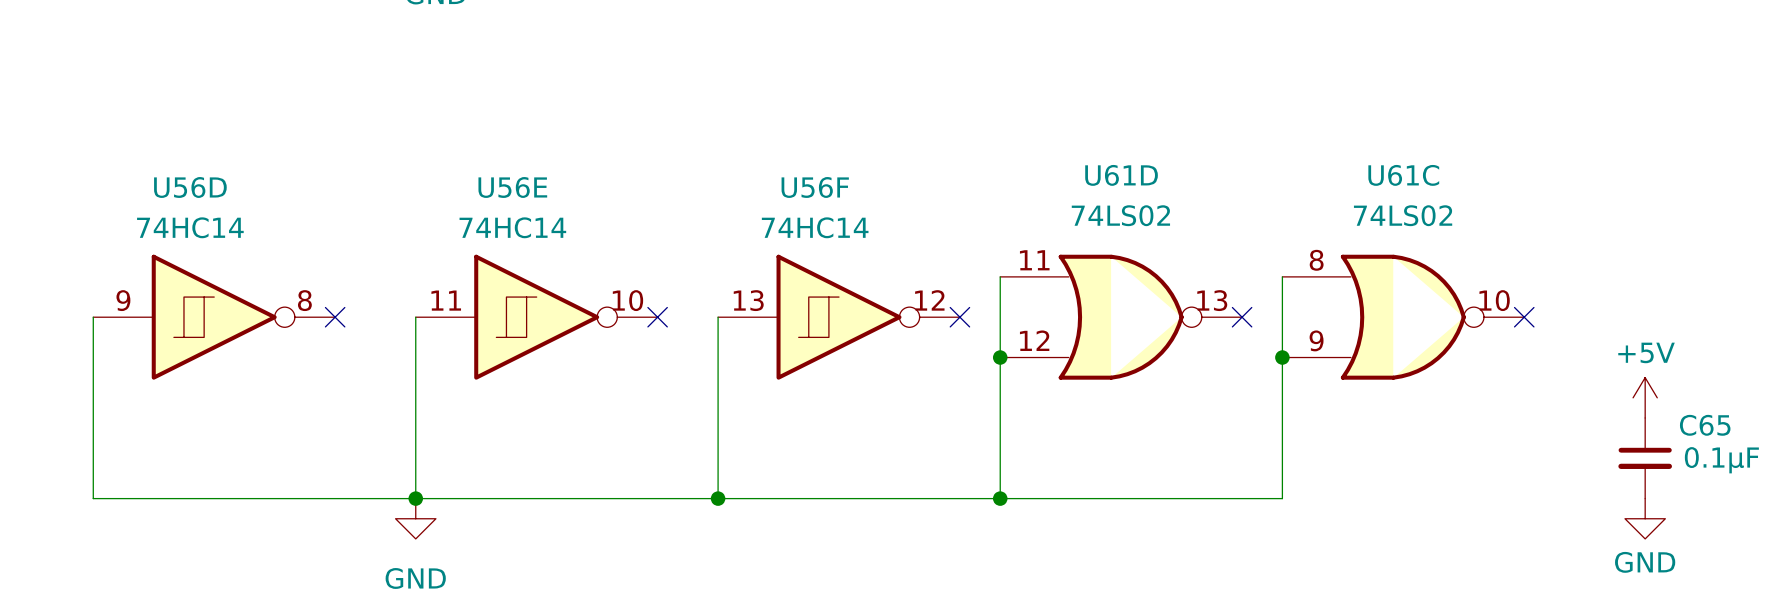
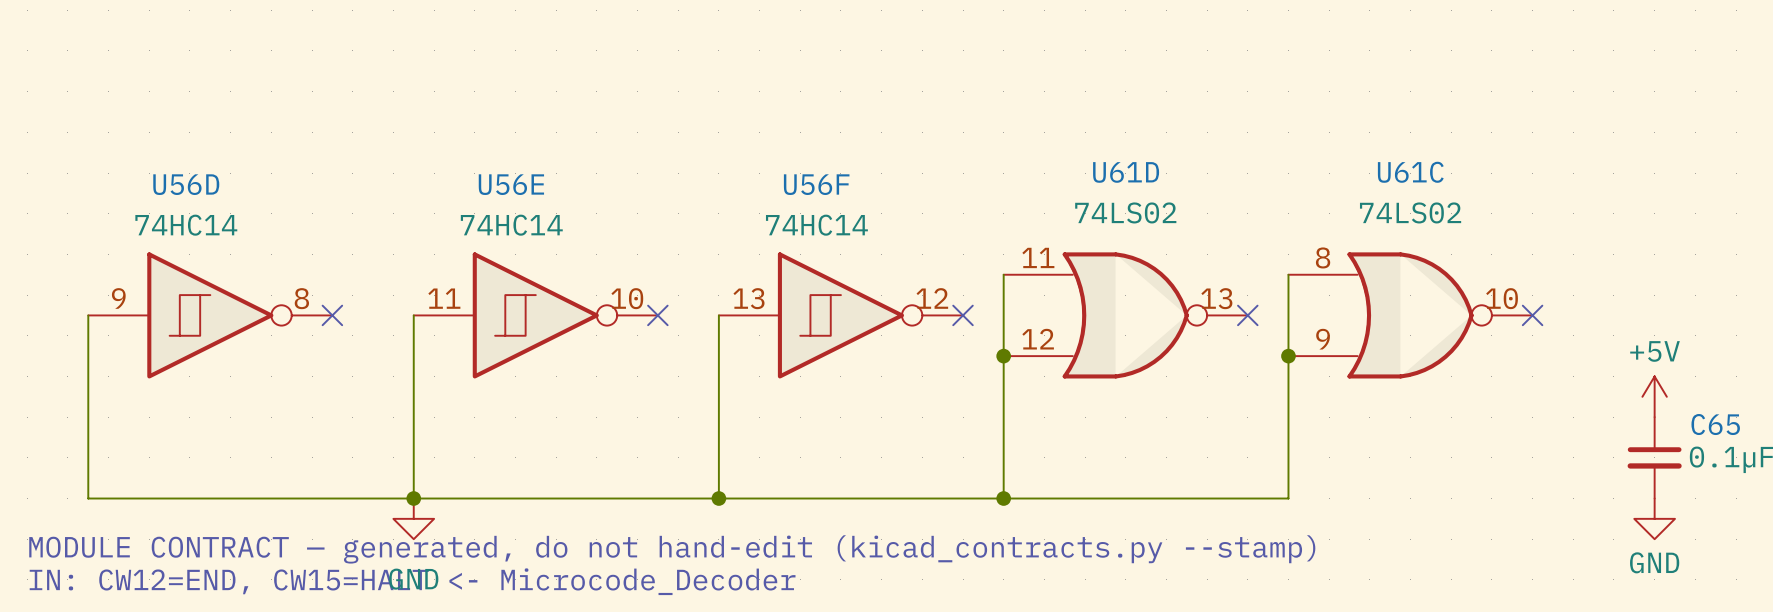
text: none -> MODULE CONTRACT — generated, do not hand-edit (kicad_contracts.py --stamp) (672, 549)
text: none -> IN: CW12=END, CW15=HALT <- Microcode_Decoder (412, 581)

